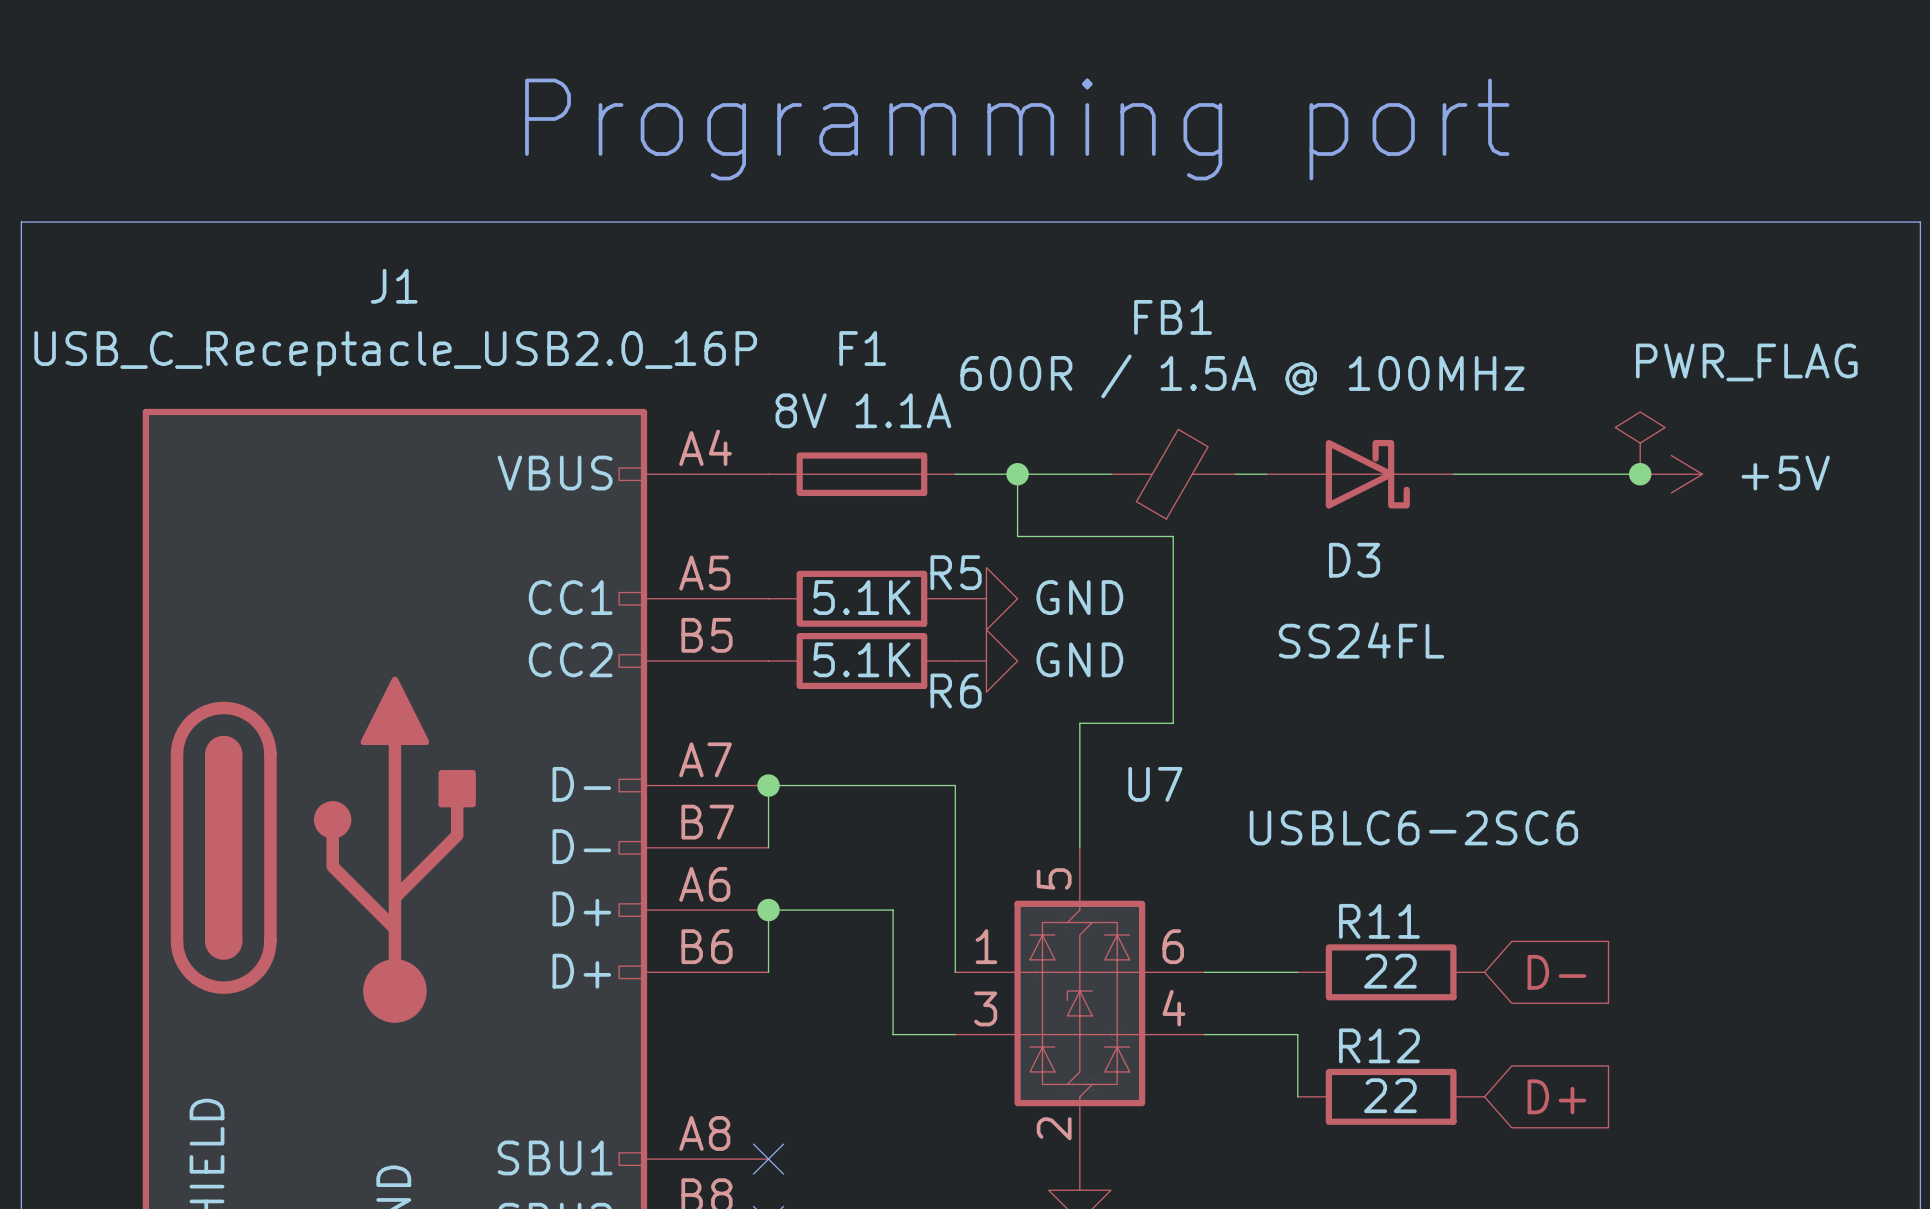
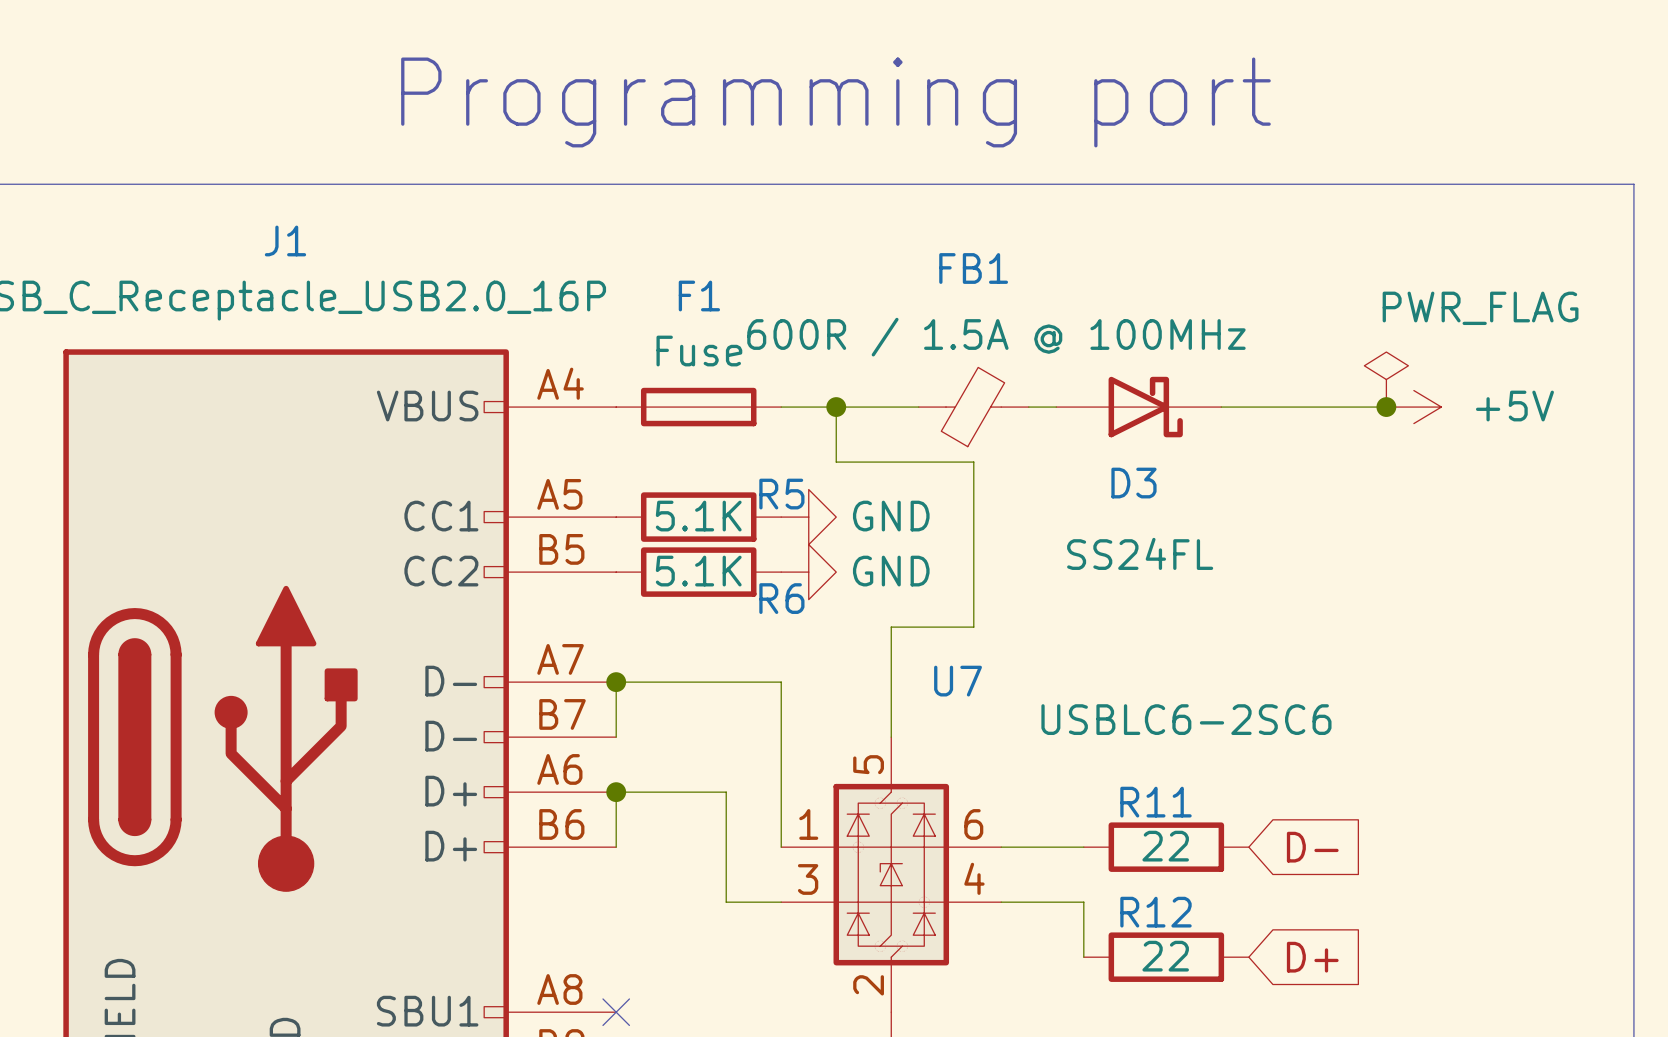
FB1 value position: 600R / 1.5A @ 100MHz (1242, 376) -> 600R / 1.5A @ 100MHz (996, 337)
F1 value: 8V 1.1A (863, 410) -> Fuse (699, 351)

